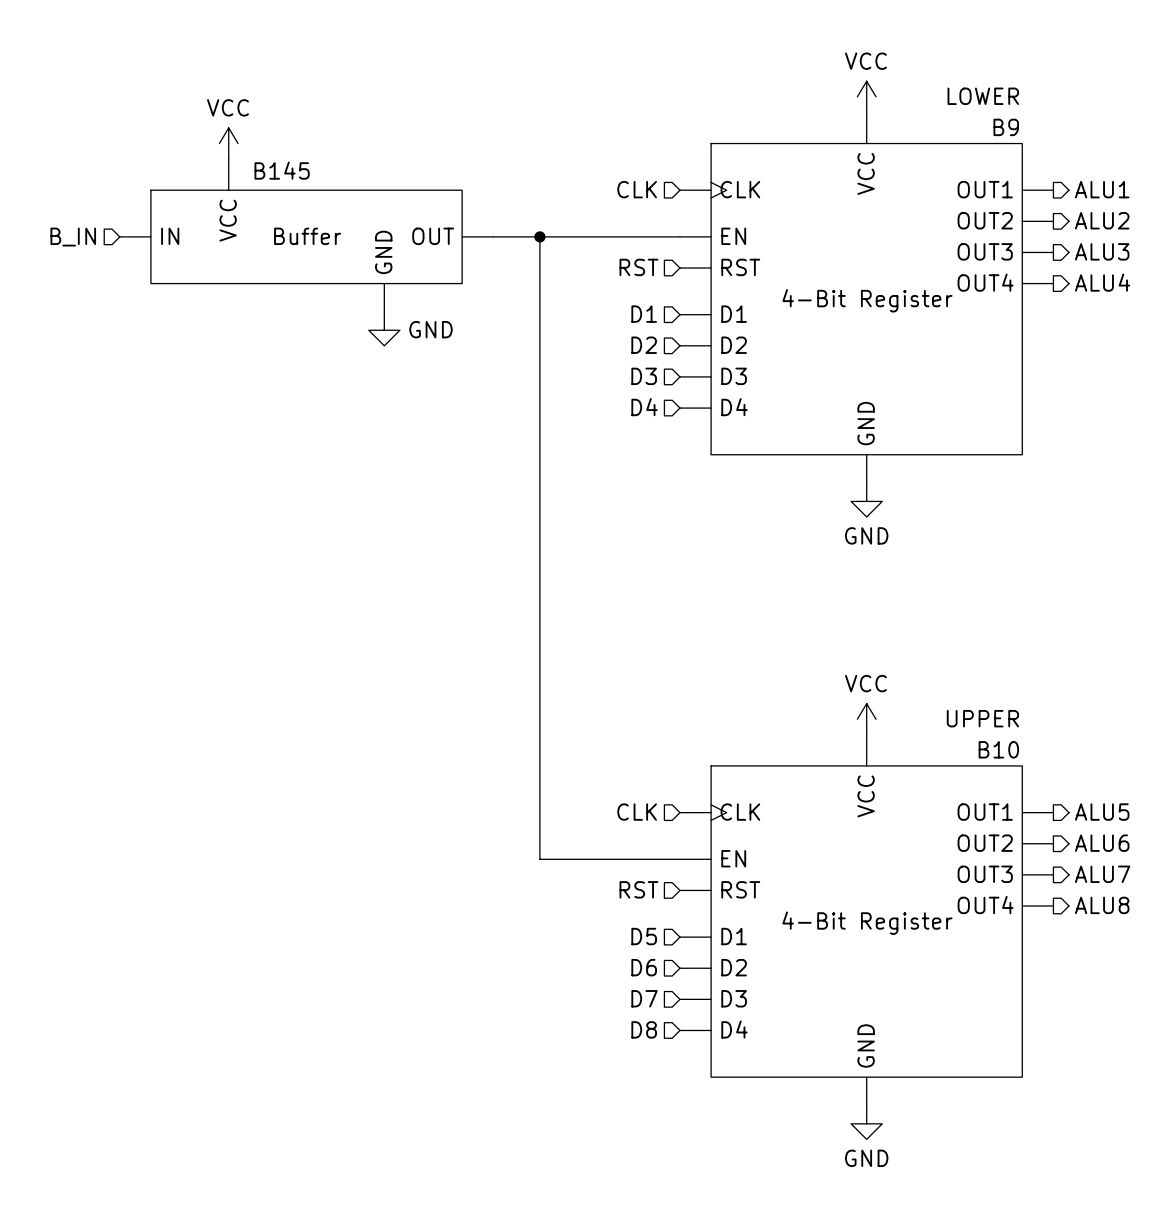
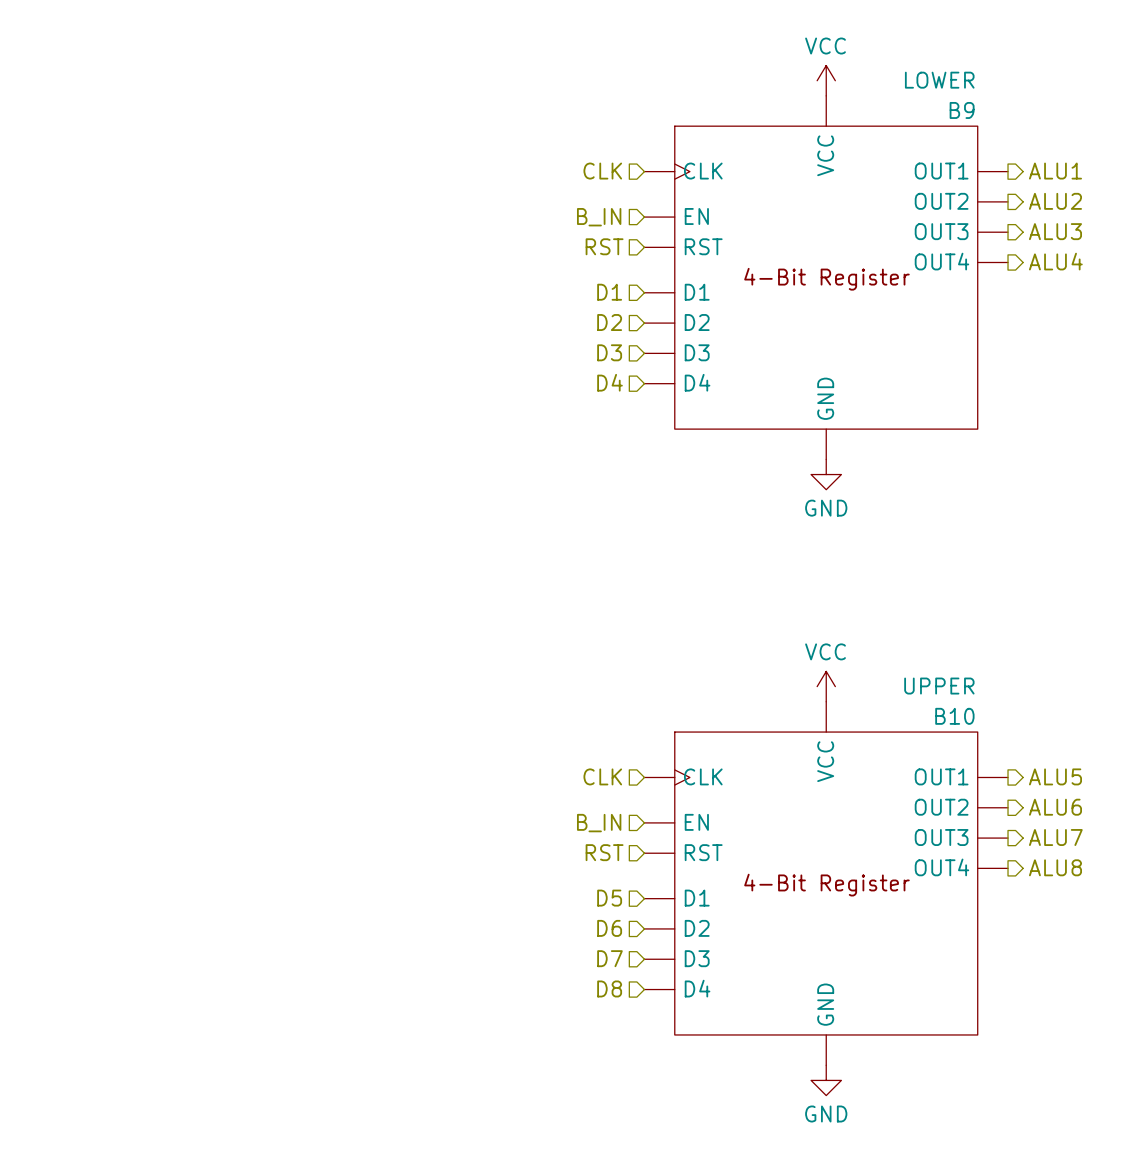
power symbol: VCC (228, 143) -> none
B145: (306, 236) -> none
wire: (493, 236) (679, 236) -> none
wire: (539, 236) (539, 859) (679, 859) -> none
junction: (539, 236) -> none
hierarchical label: B_IN (73, 237) -> none
hierarchical label: none -> B_IN (599, 217)
power symbol: GND (384, 330) -> none
hierarchical label: none -> B_IN (599, 823)

